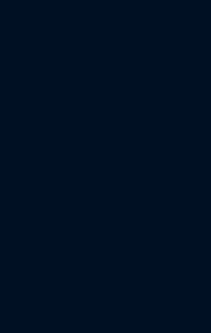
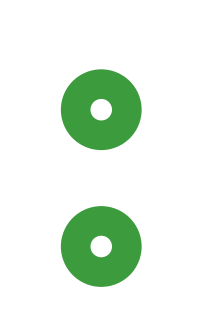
part: none -> (101, 178)

